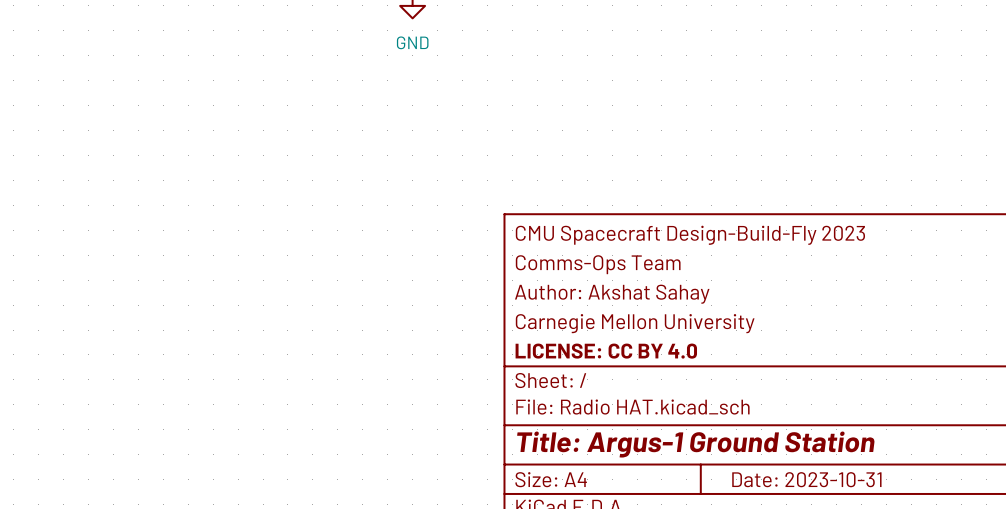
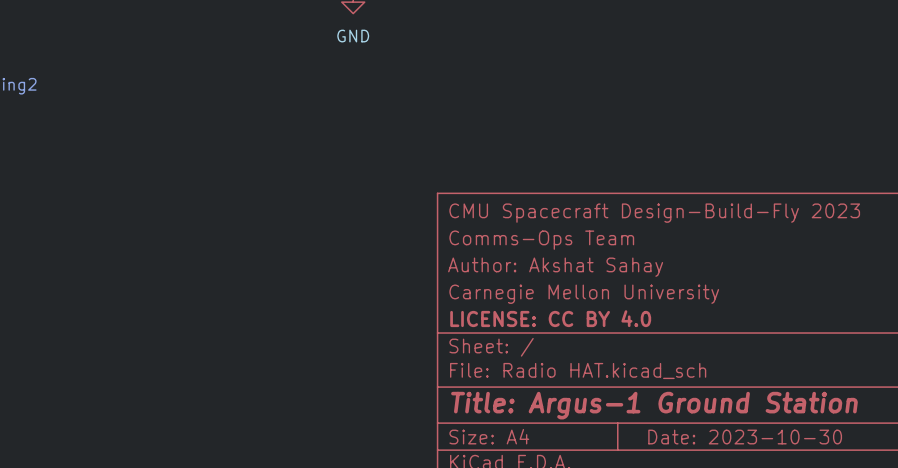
title block: Date: 2023-10-31 (806, 479) -> Date: 2023-10-30 (745, 437)

